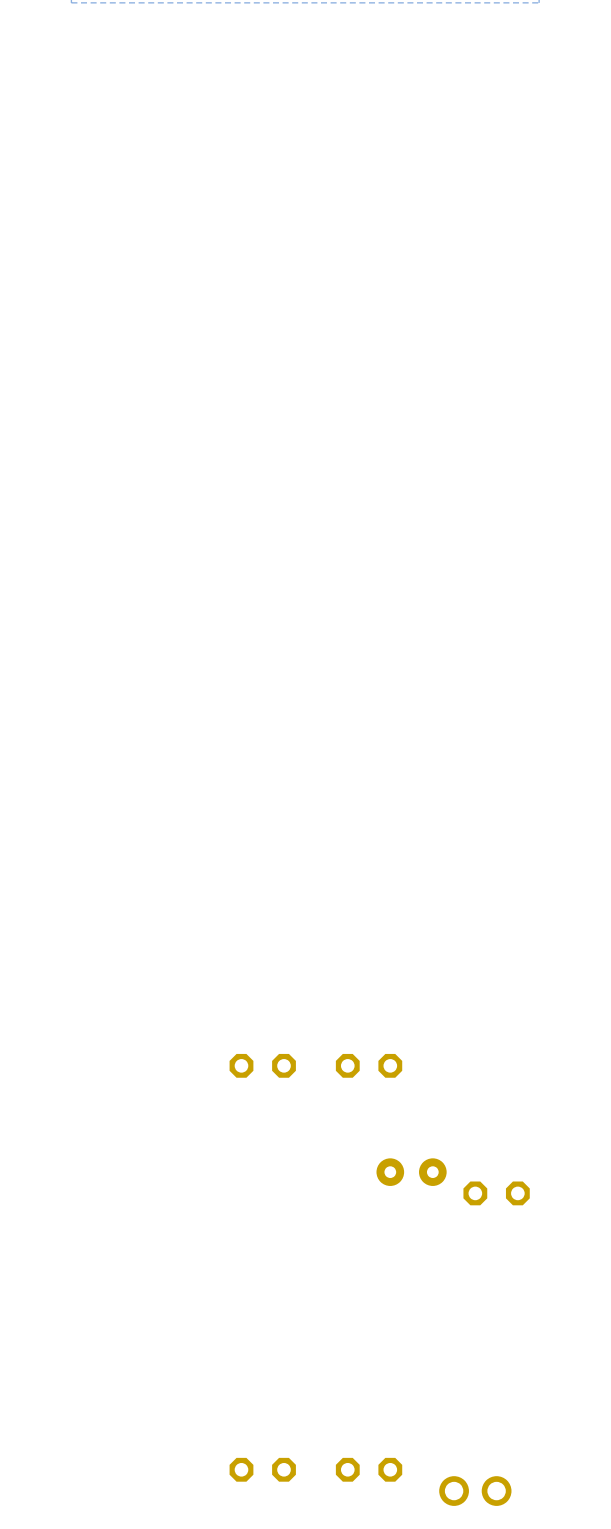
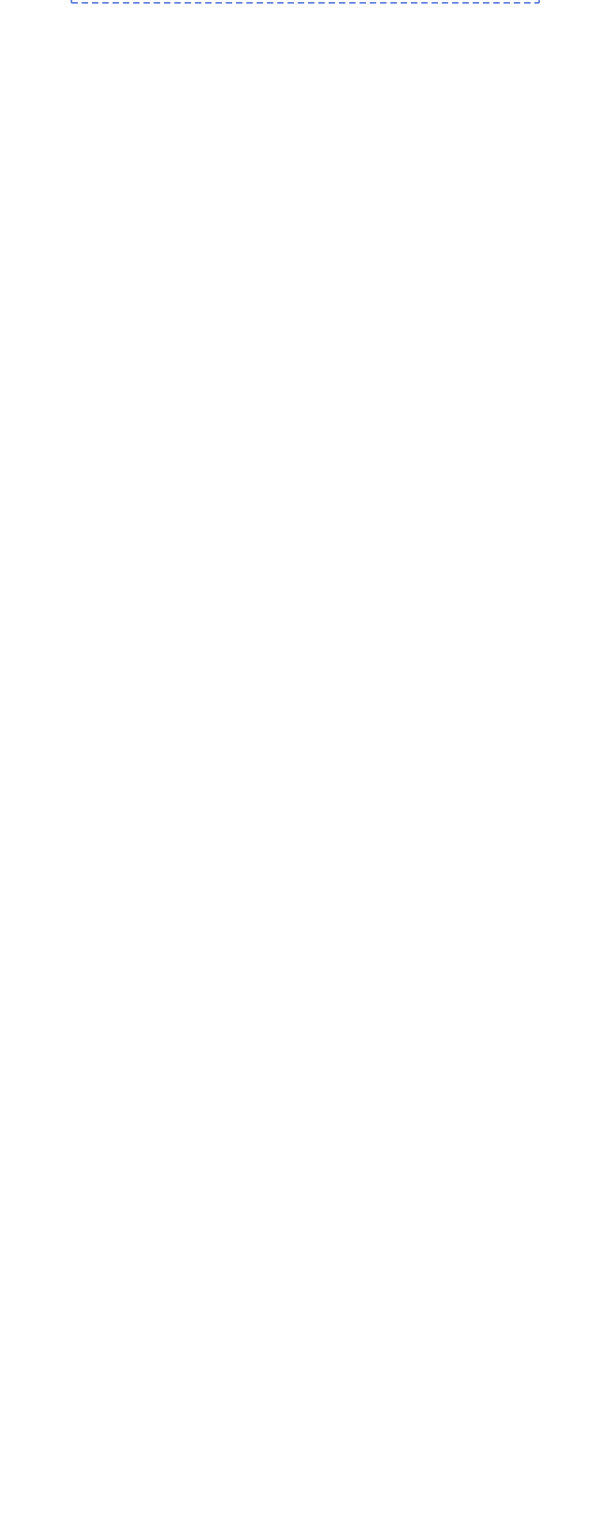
part: (262, 1065) -> none
part: (369, 1065) -> none
part: (411, 1172) -> none
part: (496, 1193) -> none
part: (262, 1469) -> none
part: (369, 1469) -> none
part: (475, 1491) -> none

